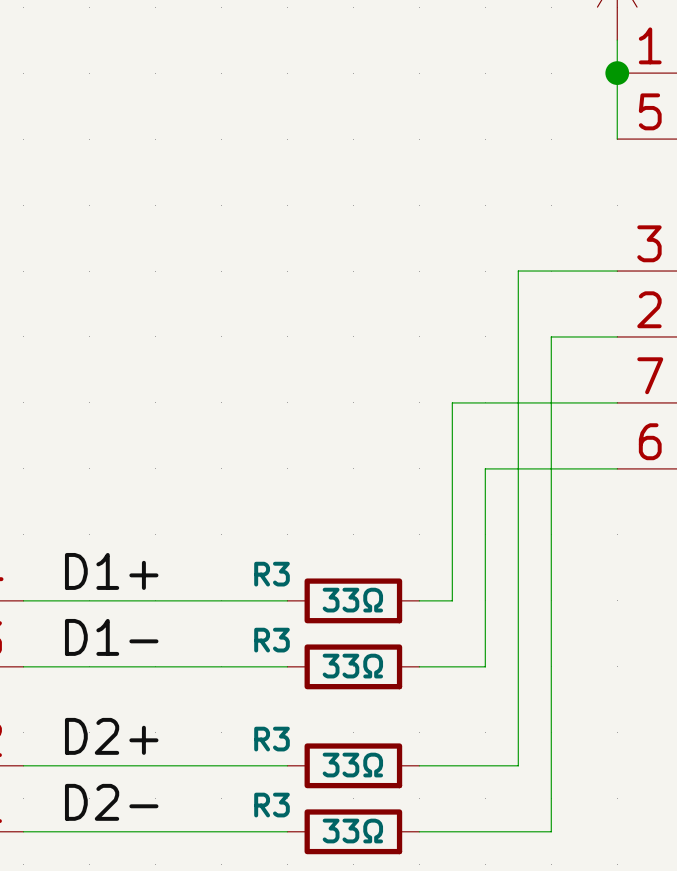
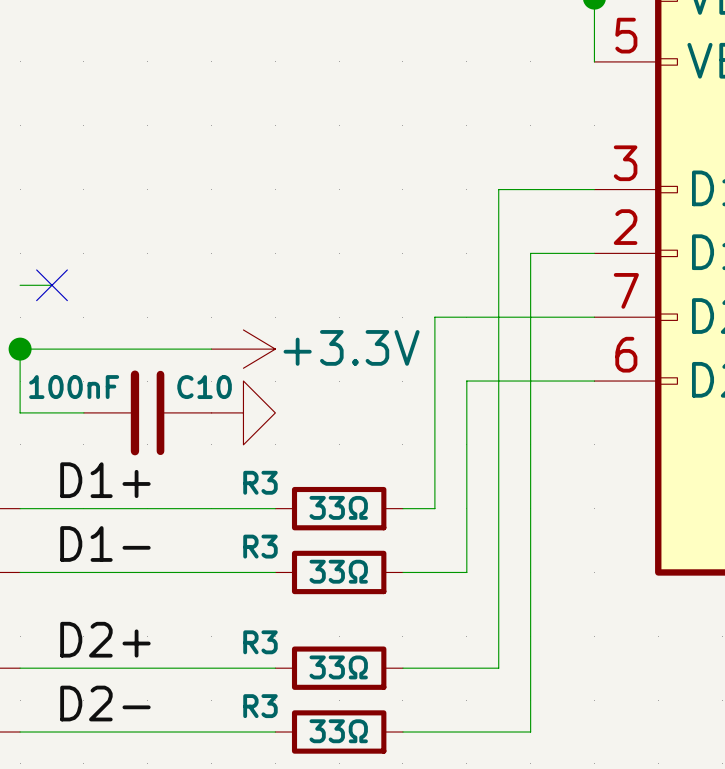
wire: none -> (20, 285) (52, 285)
no-connect mark: none -> (52, 285)
junction: none -> (20, 349)
wire: none -> (211, 349) (20, 349) (20, 412) (83, 412)
power symbol: none -> +3.3V (243, 349)
C10: none -> 100nF (147, 412)
power symbol: none -> (243, 412)

